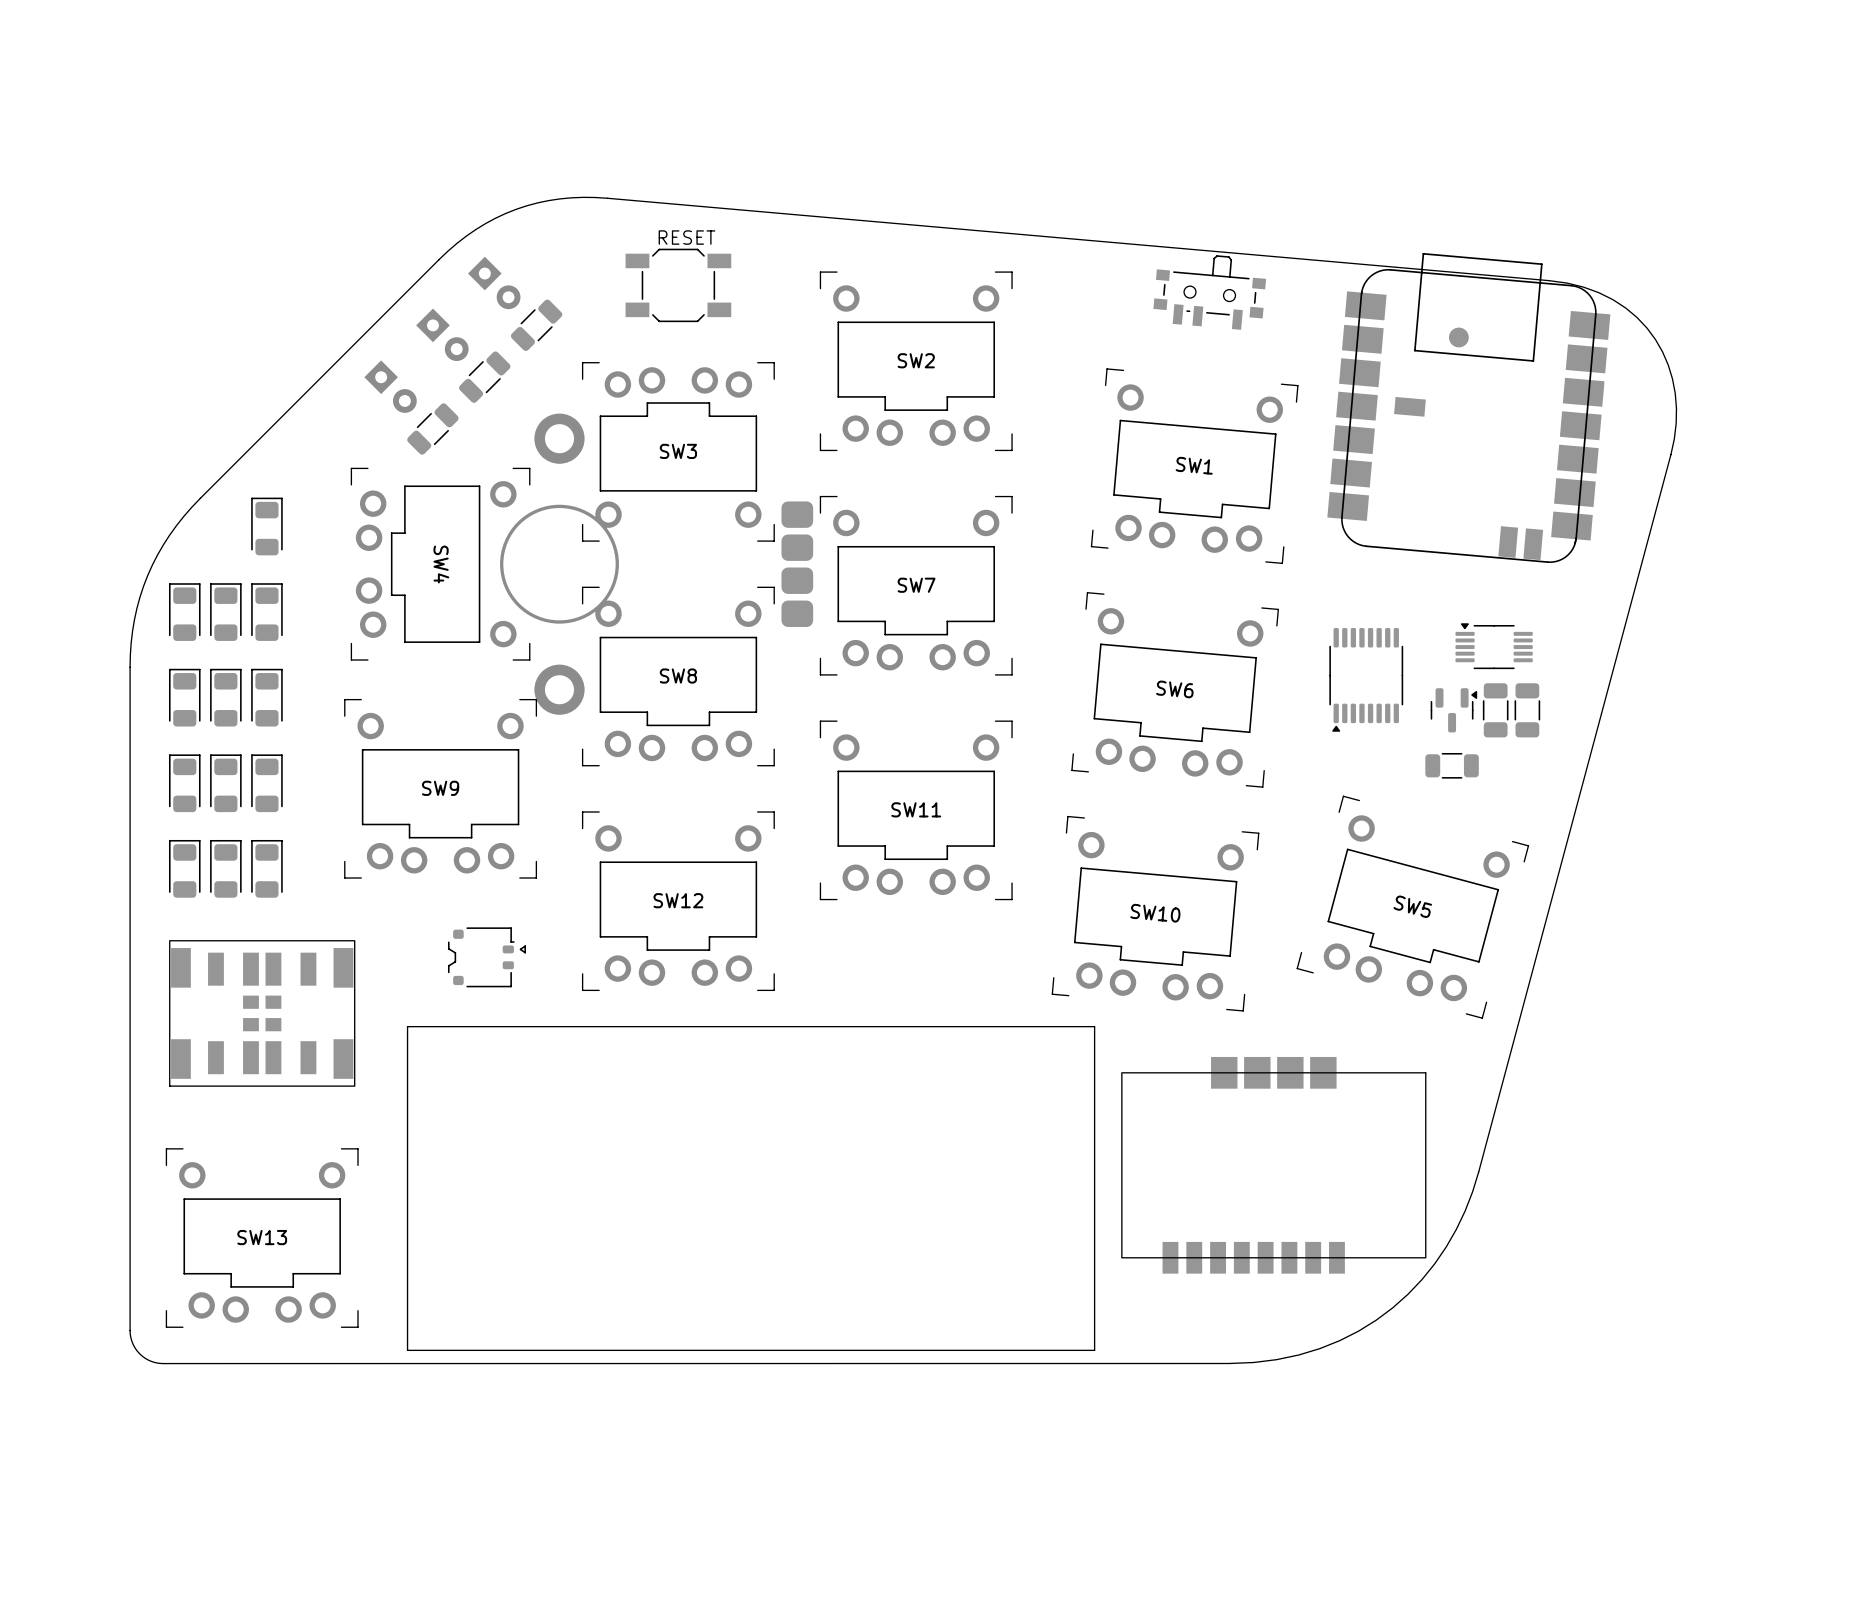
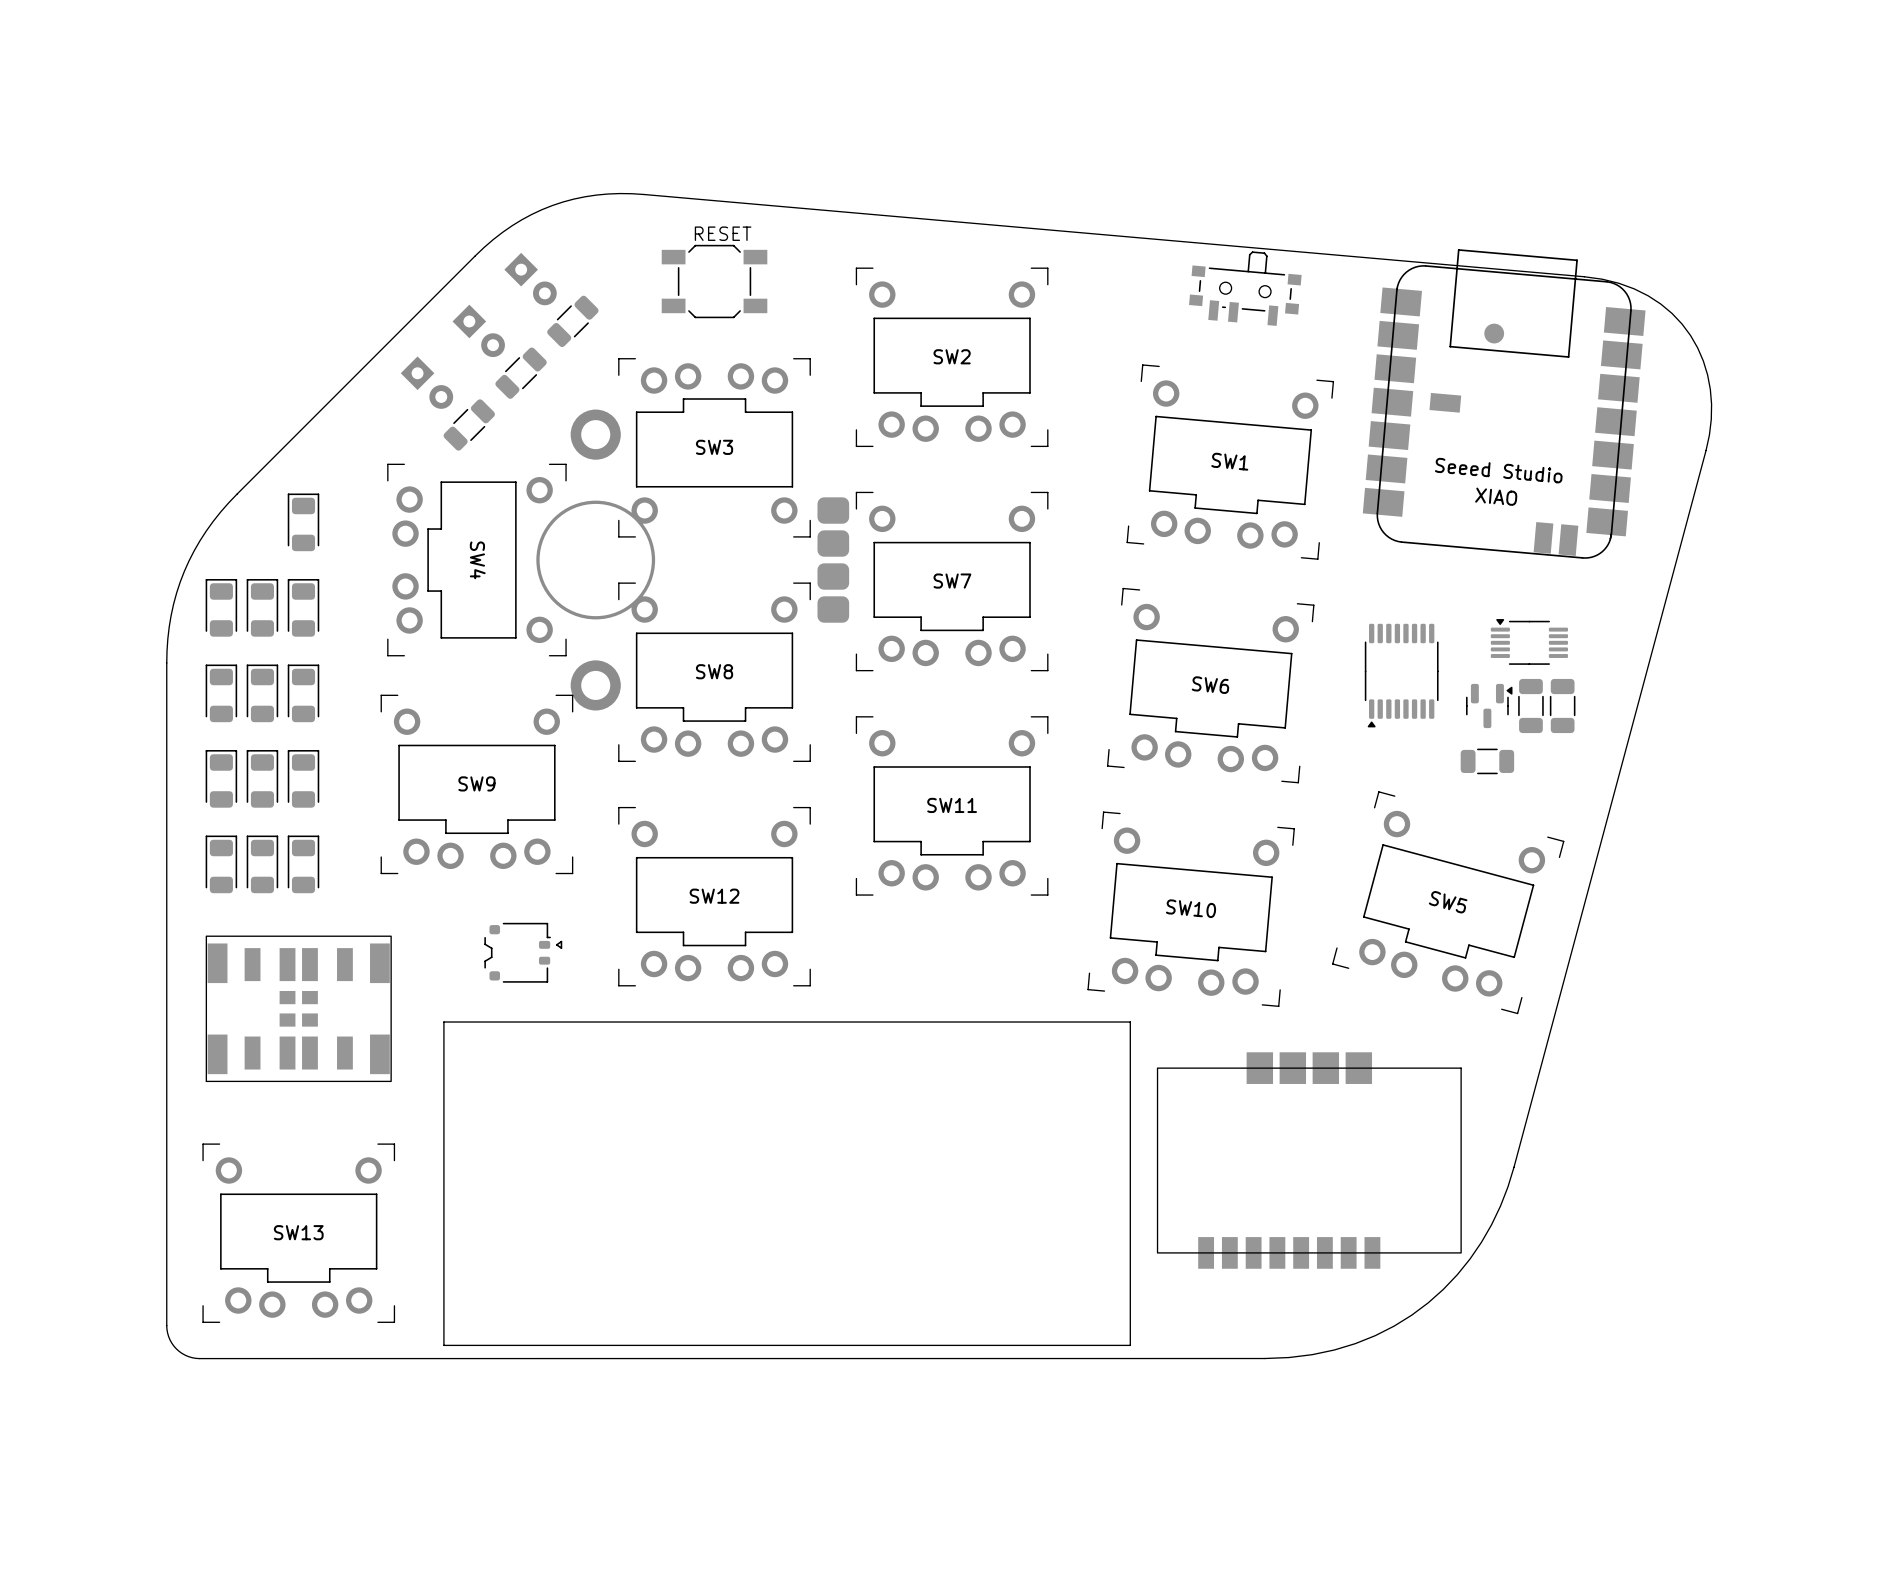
part text: none -> Seeed Studio (1498, 470)
part text: none -> XIAO (1496, 496)

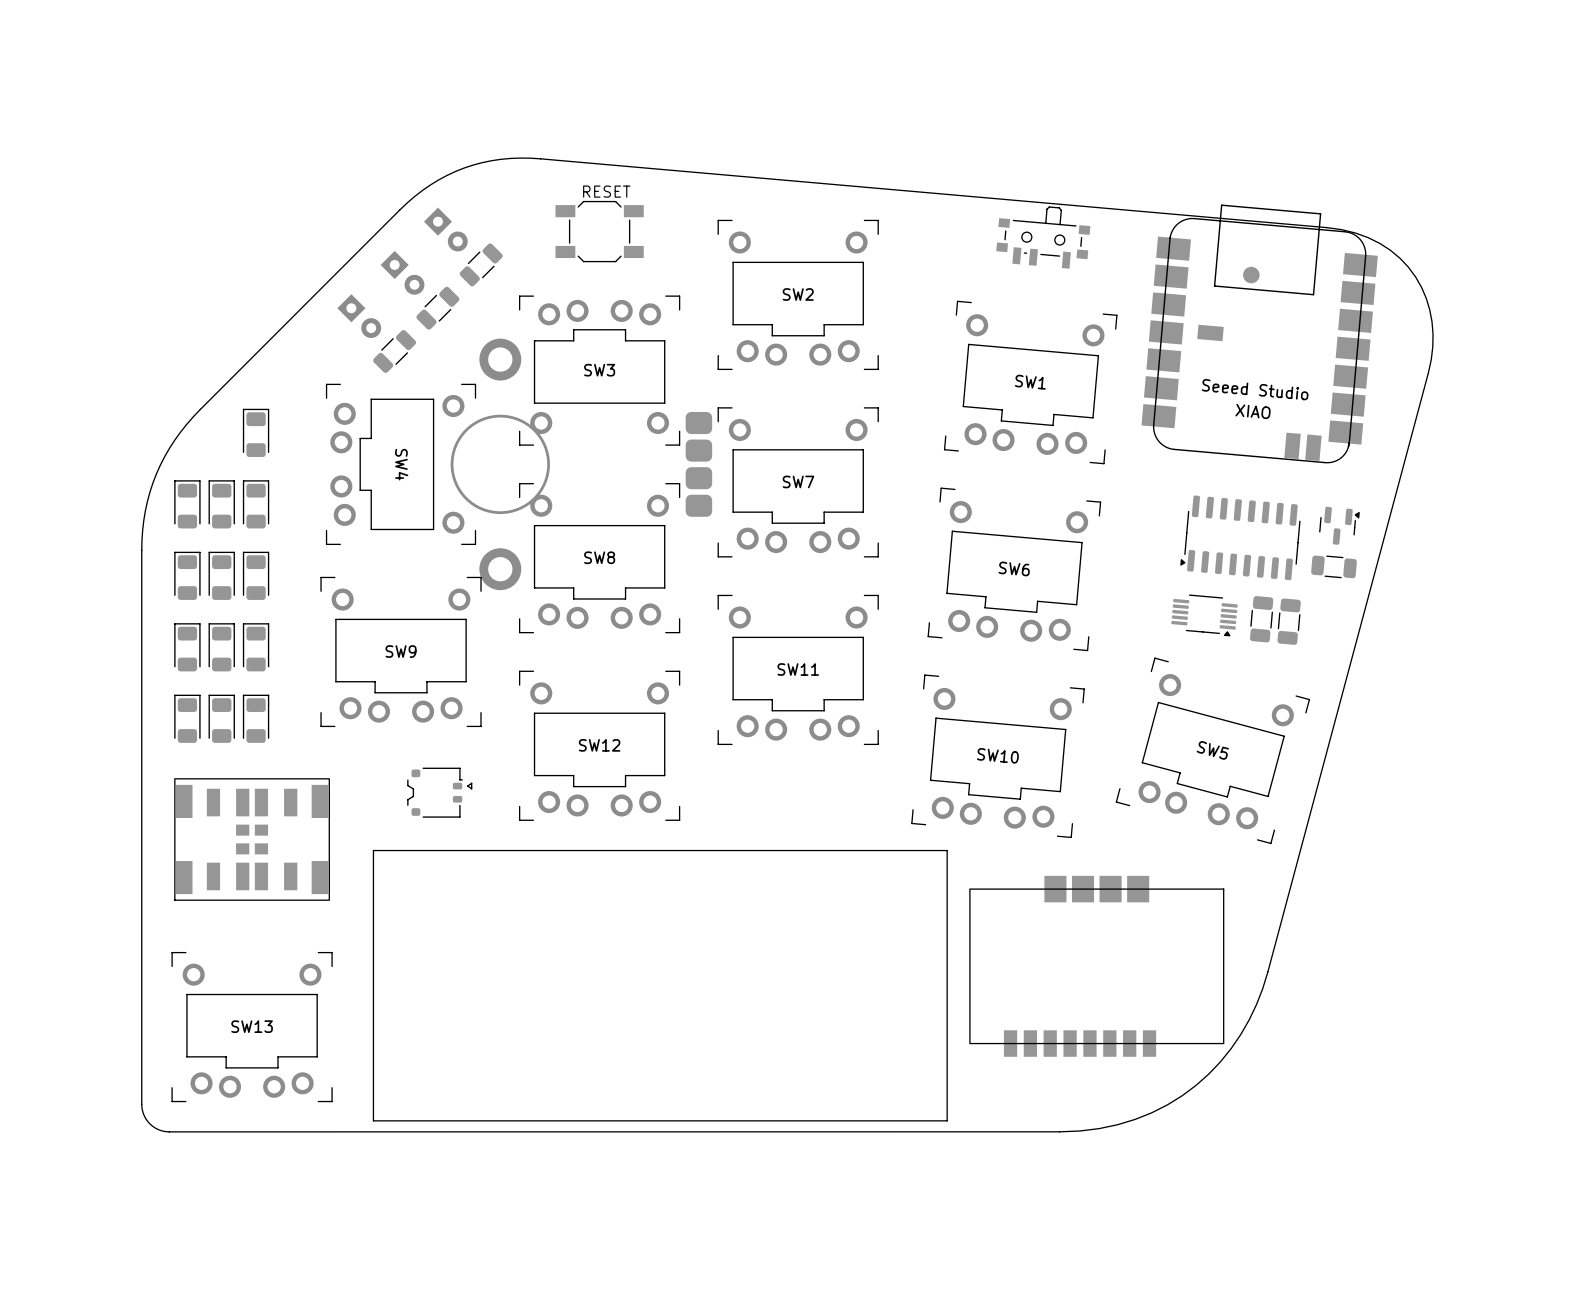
part: none -> (1339, 525)
part: (1529, 641) -> none
part: none -> (1240, 537)
part: (1401, 675) -> none
part: none -> (1334, 566)
part: (1489, 706) -> none
part: (1530, 706) -> none
part: (1562, 706) -> none
part: none -> (1204, 615)
part: none -> (1261, 619)
part: none -> (1289, 621)
part: (1487, 761) -> none

